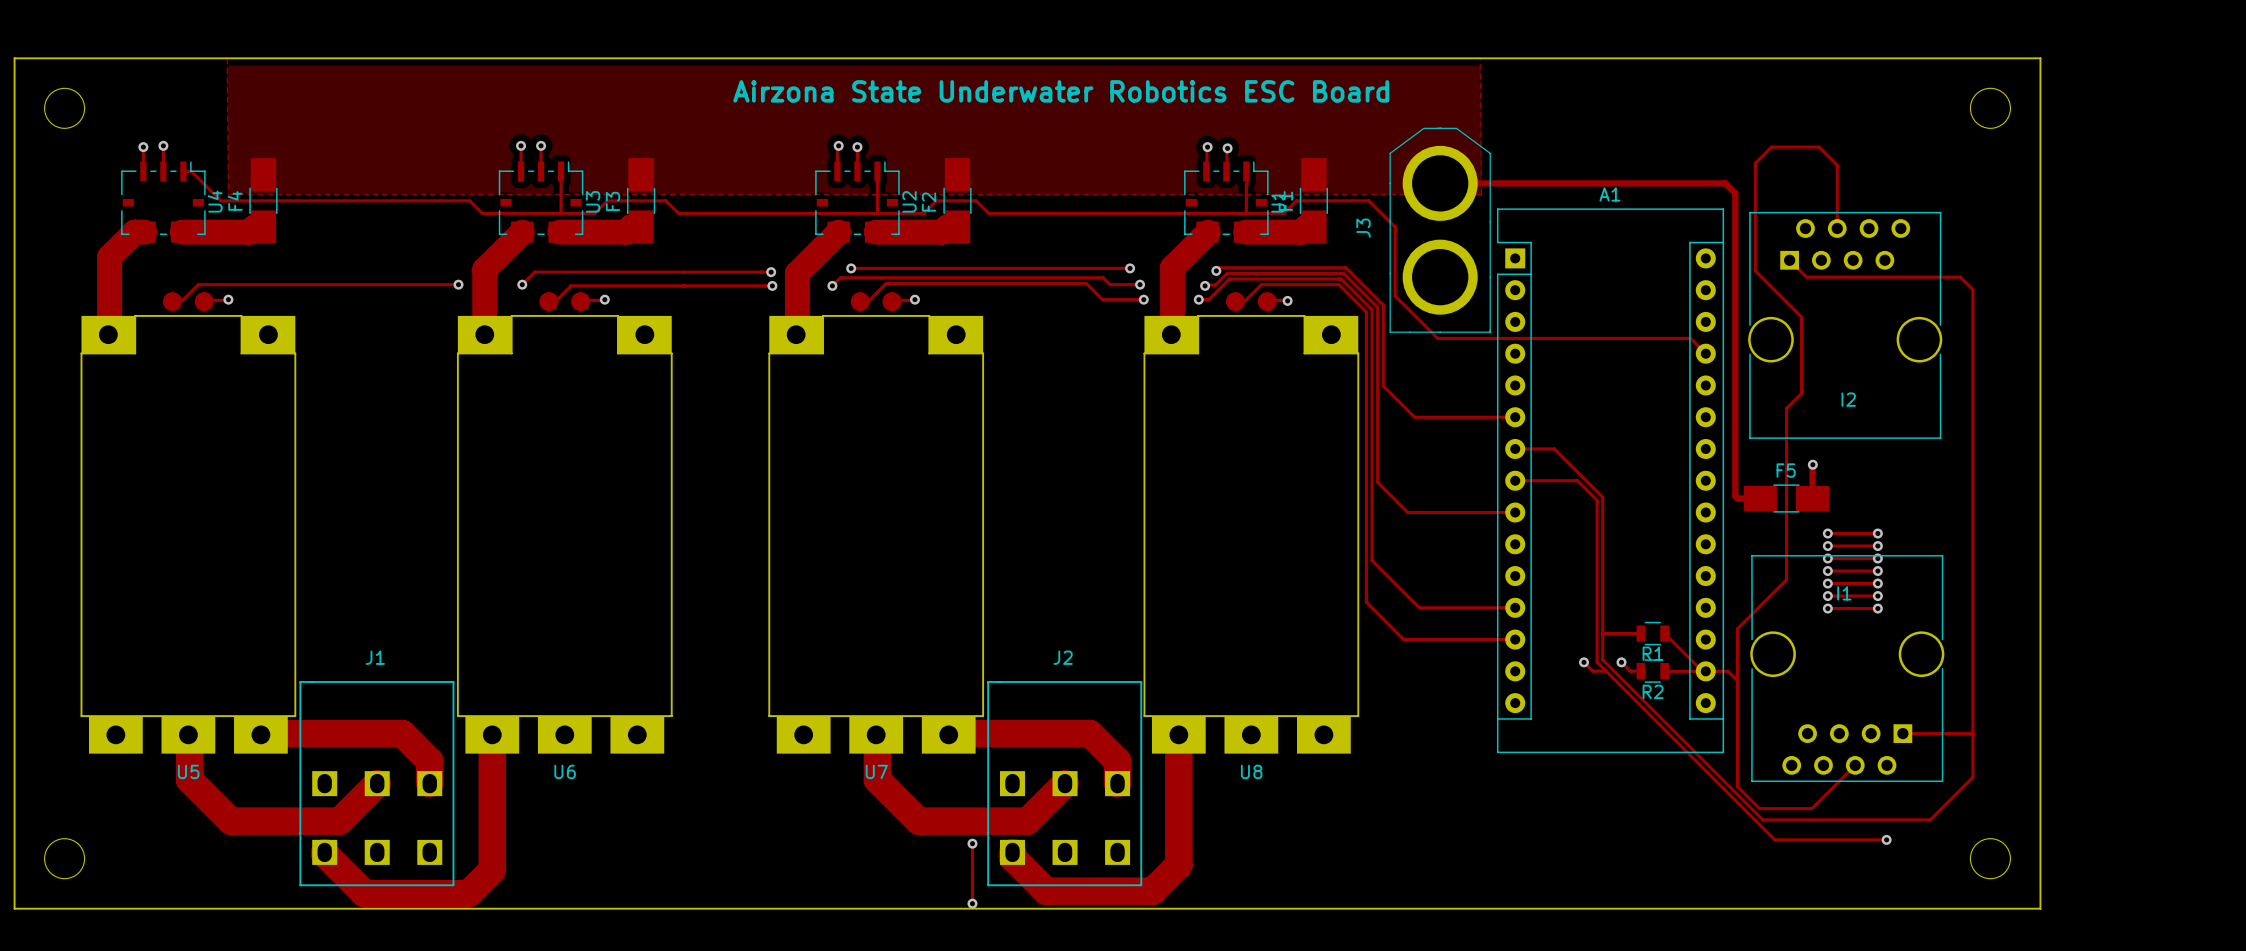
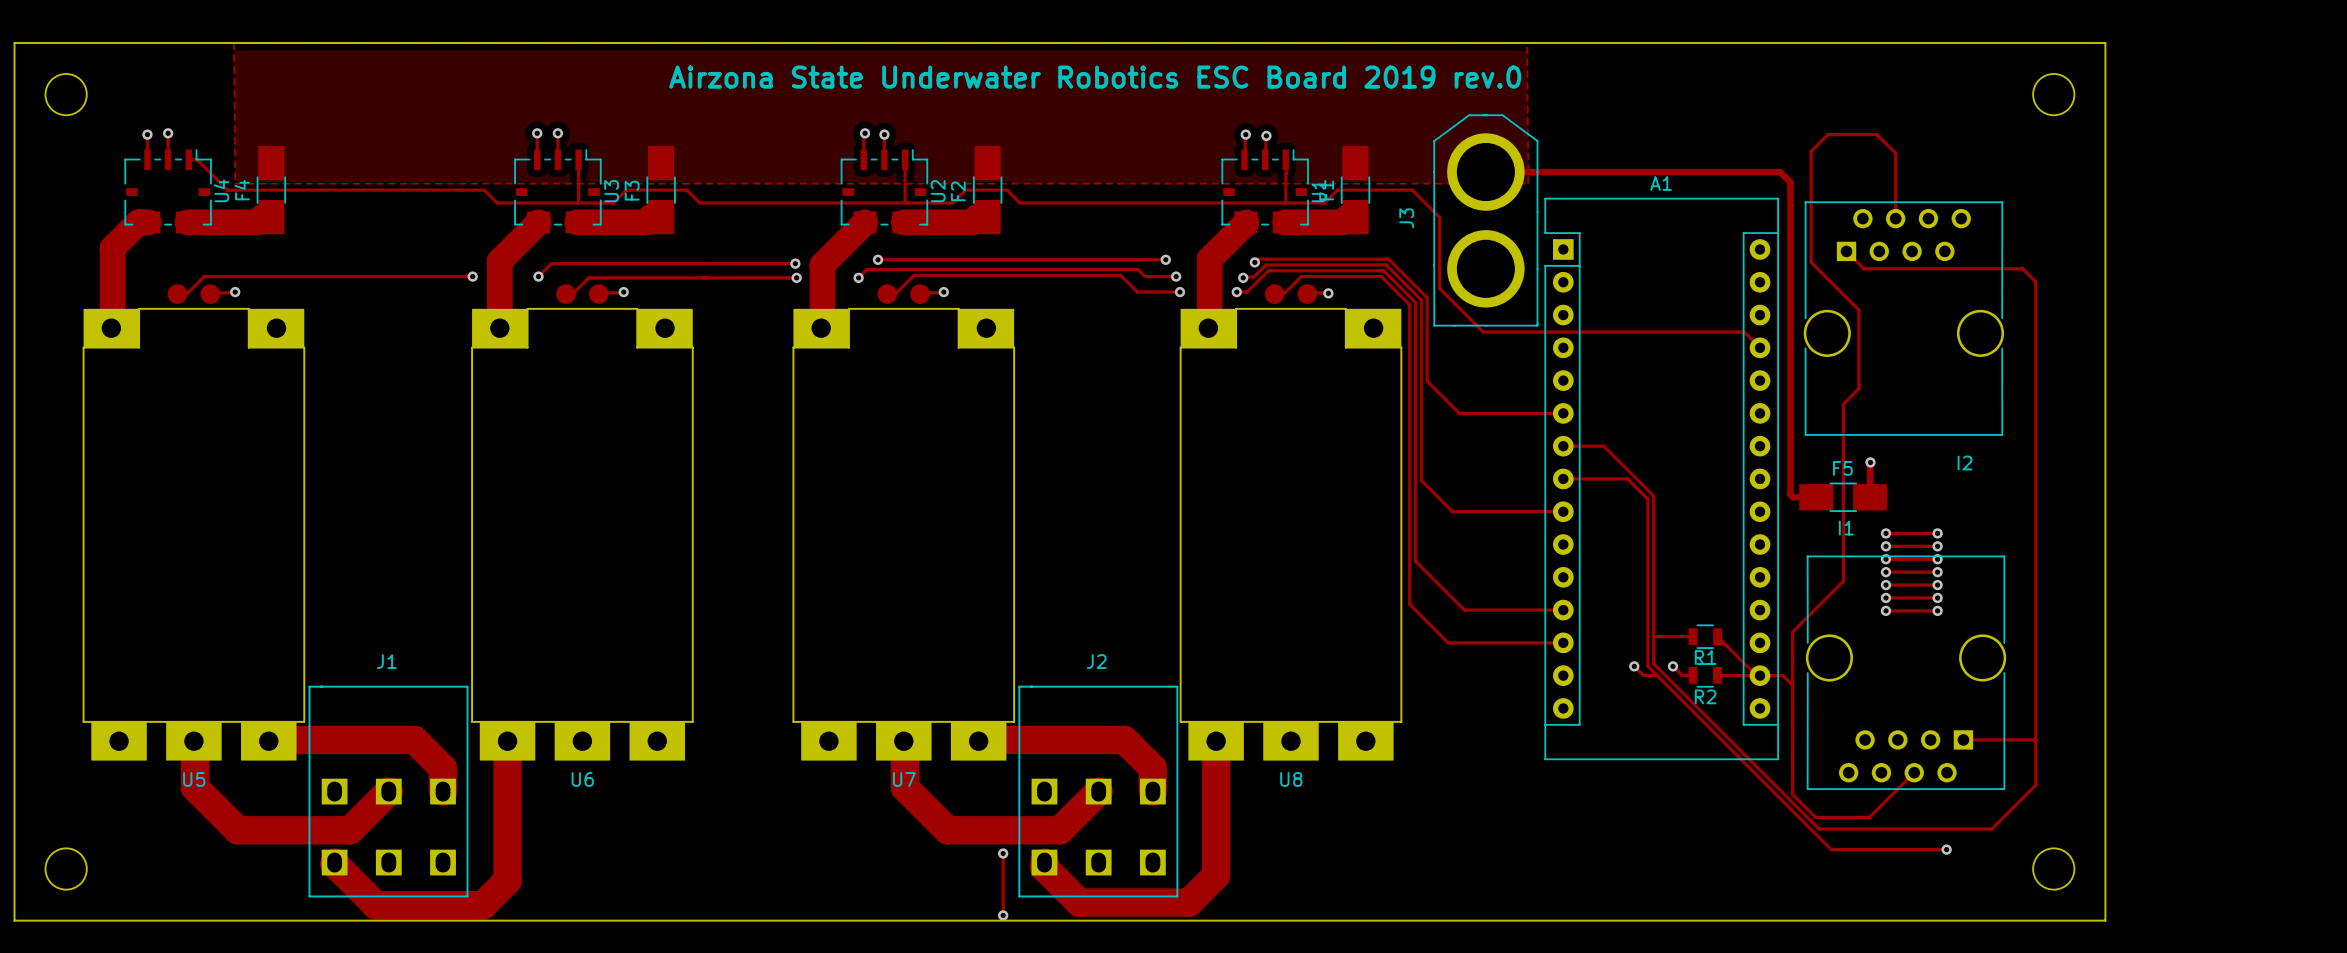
text: Airzona State Underwater Robotics ESC Board (1061, 91) -> Airzona State Underwater Robotics ESC Board 2019 rev.0 (1095, 77)
I2 name position: I2 (1848, 399) -> I2 (1965, 462)
I1 name position: I1 (1844, 593) -> I1 (1846, 528)

